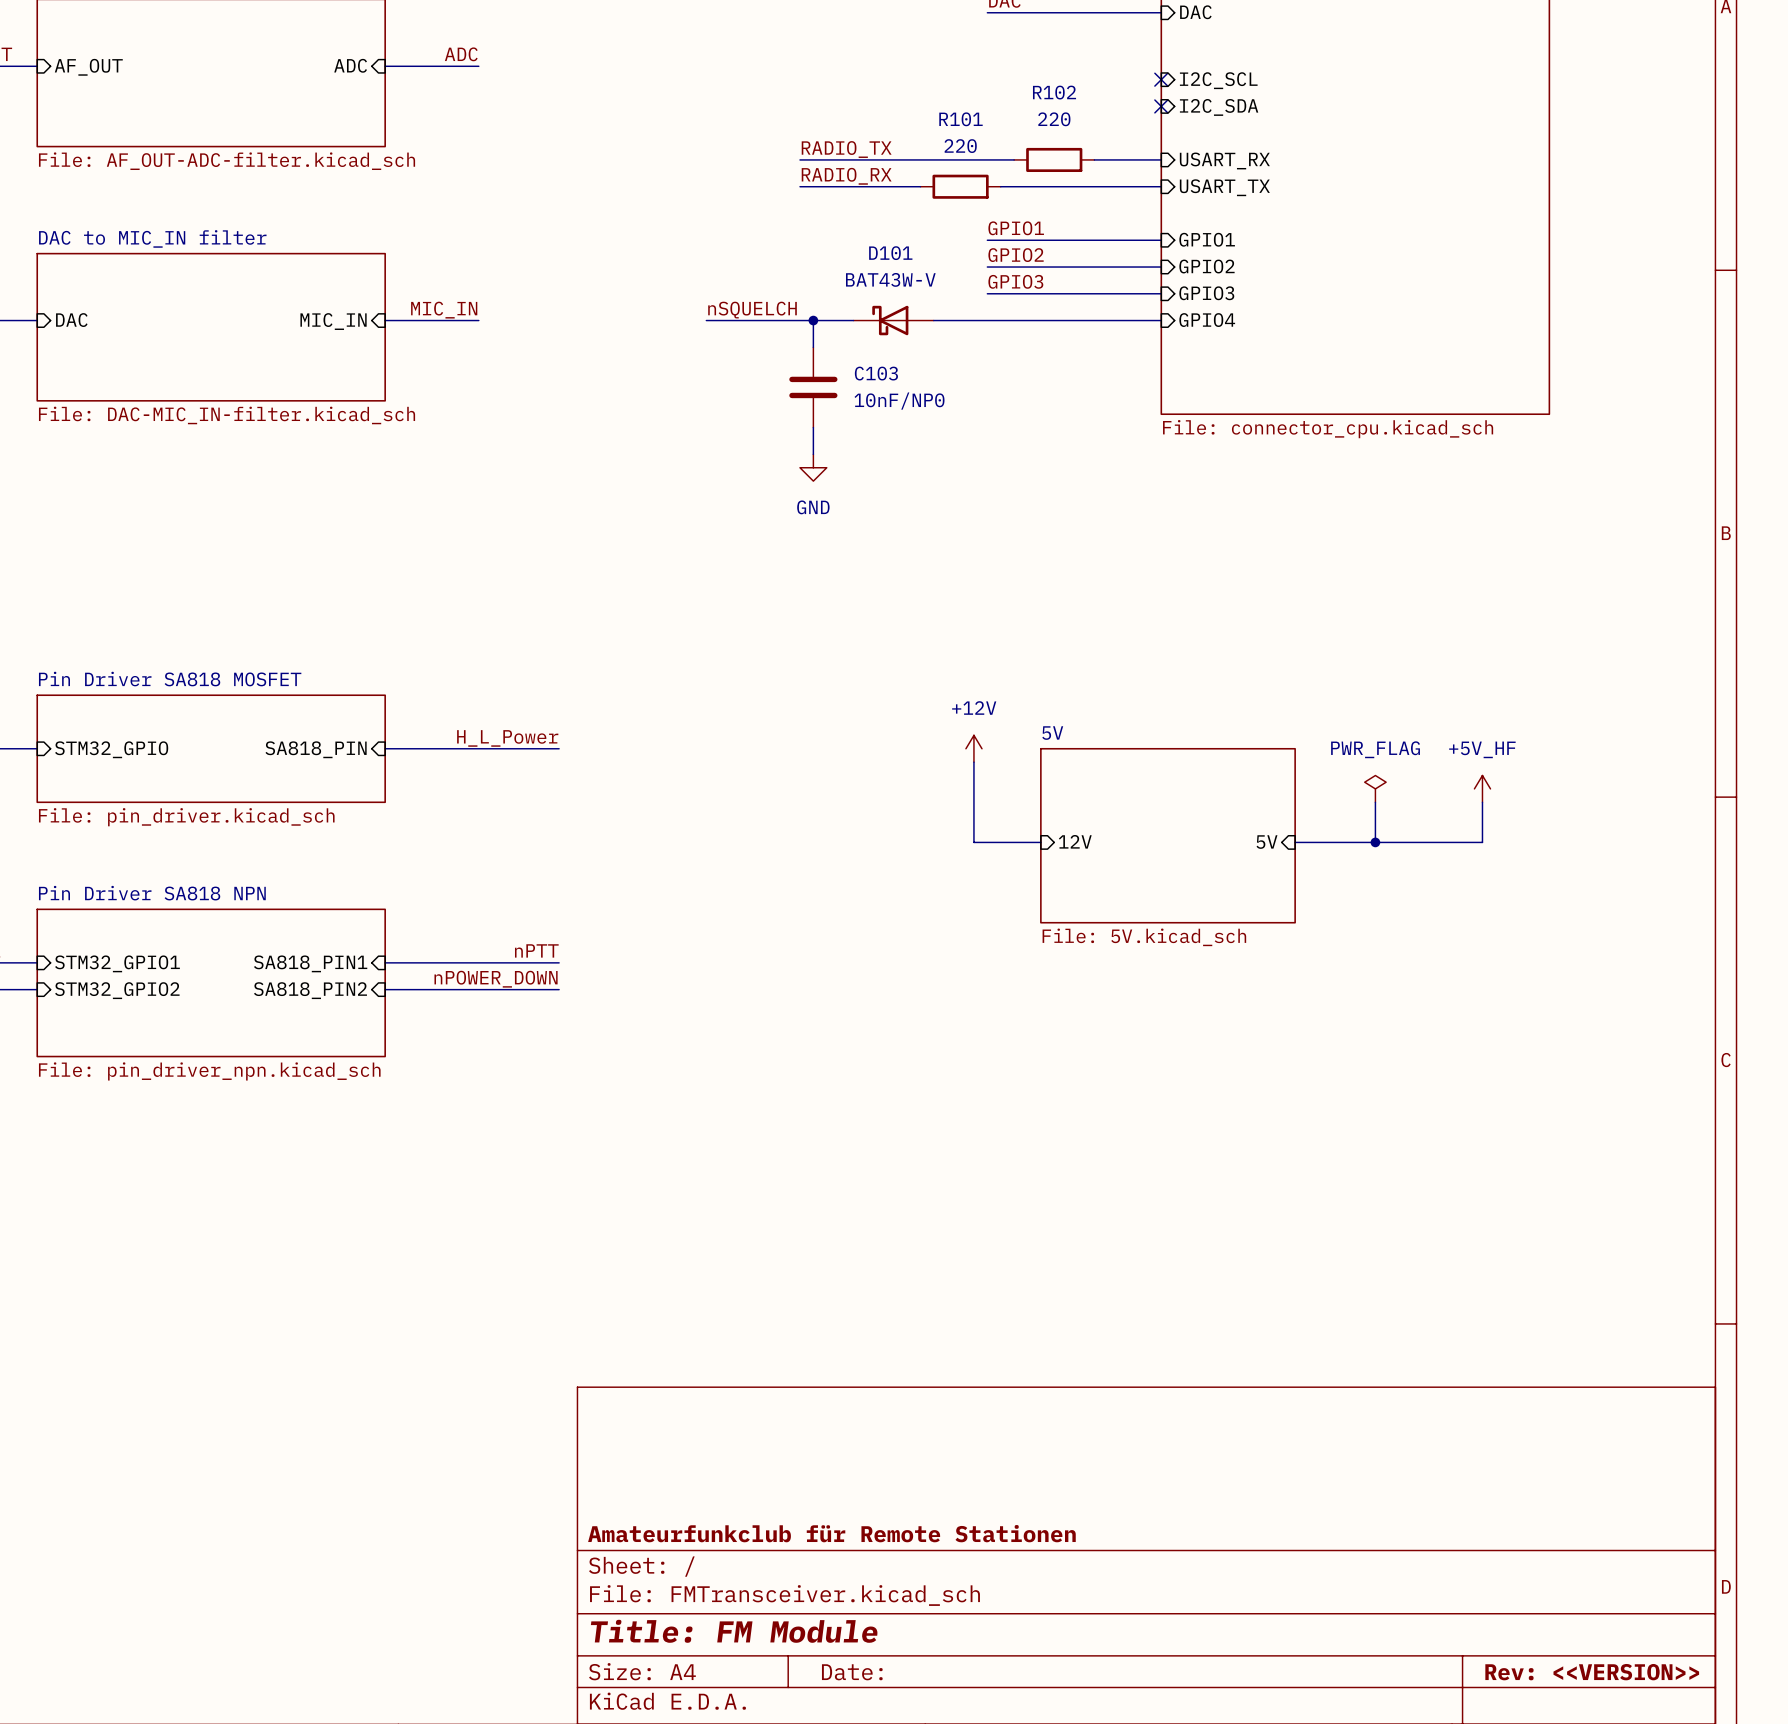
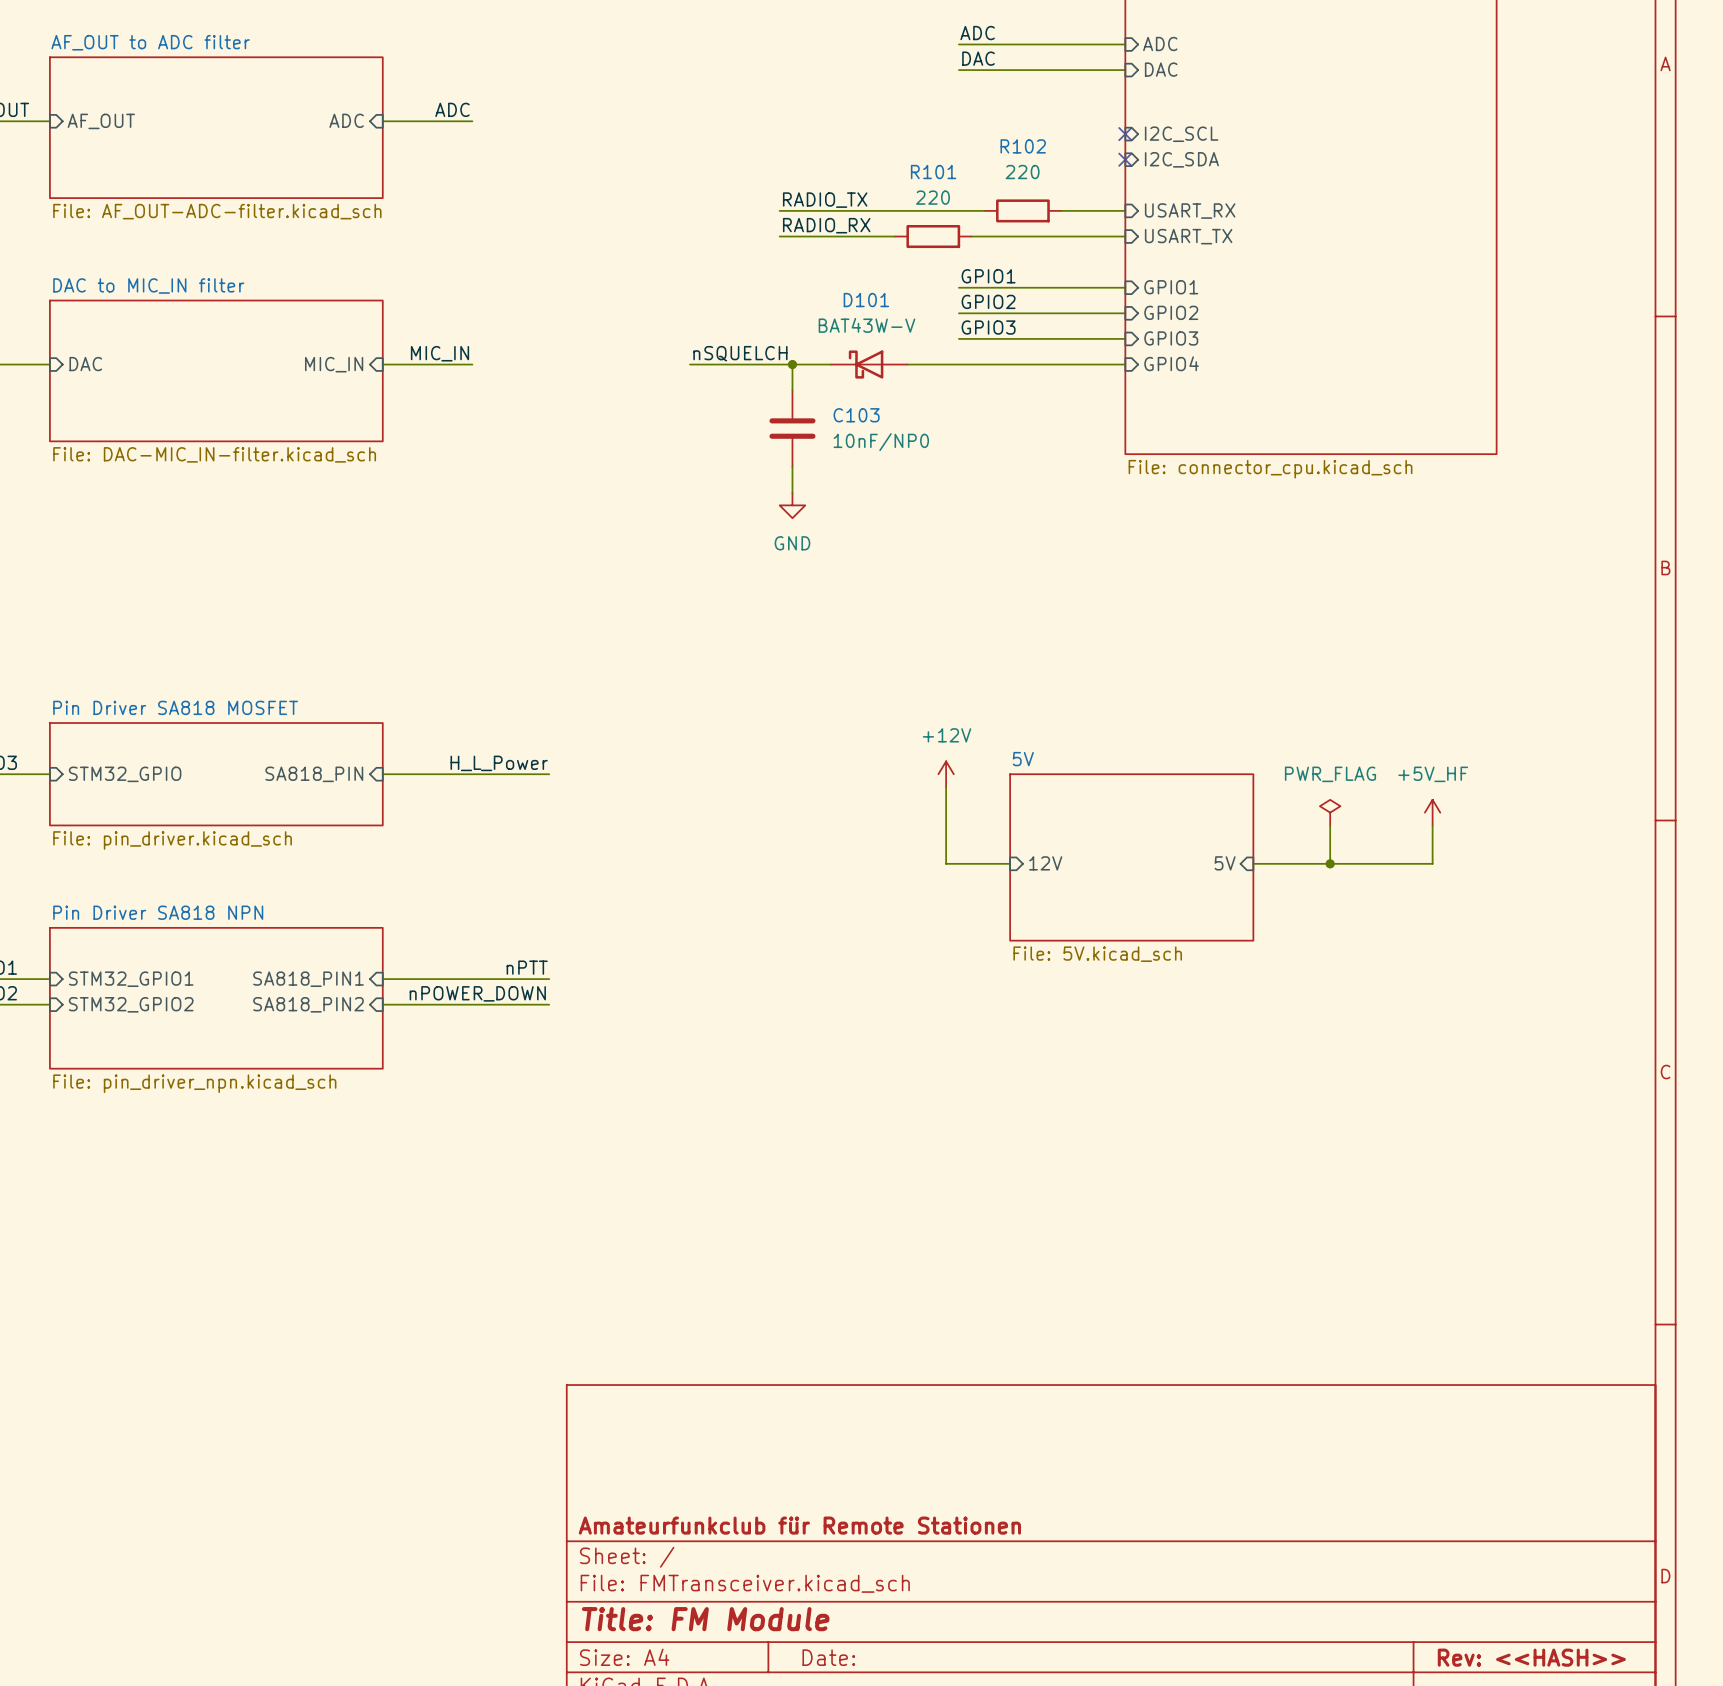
title block: Rev: <<VERSION>> (1592, 1672) -> Rev: <<HASH>> (1531, 1657)

